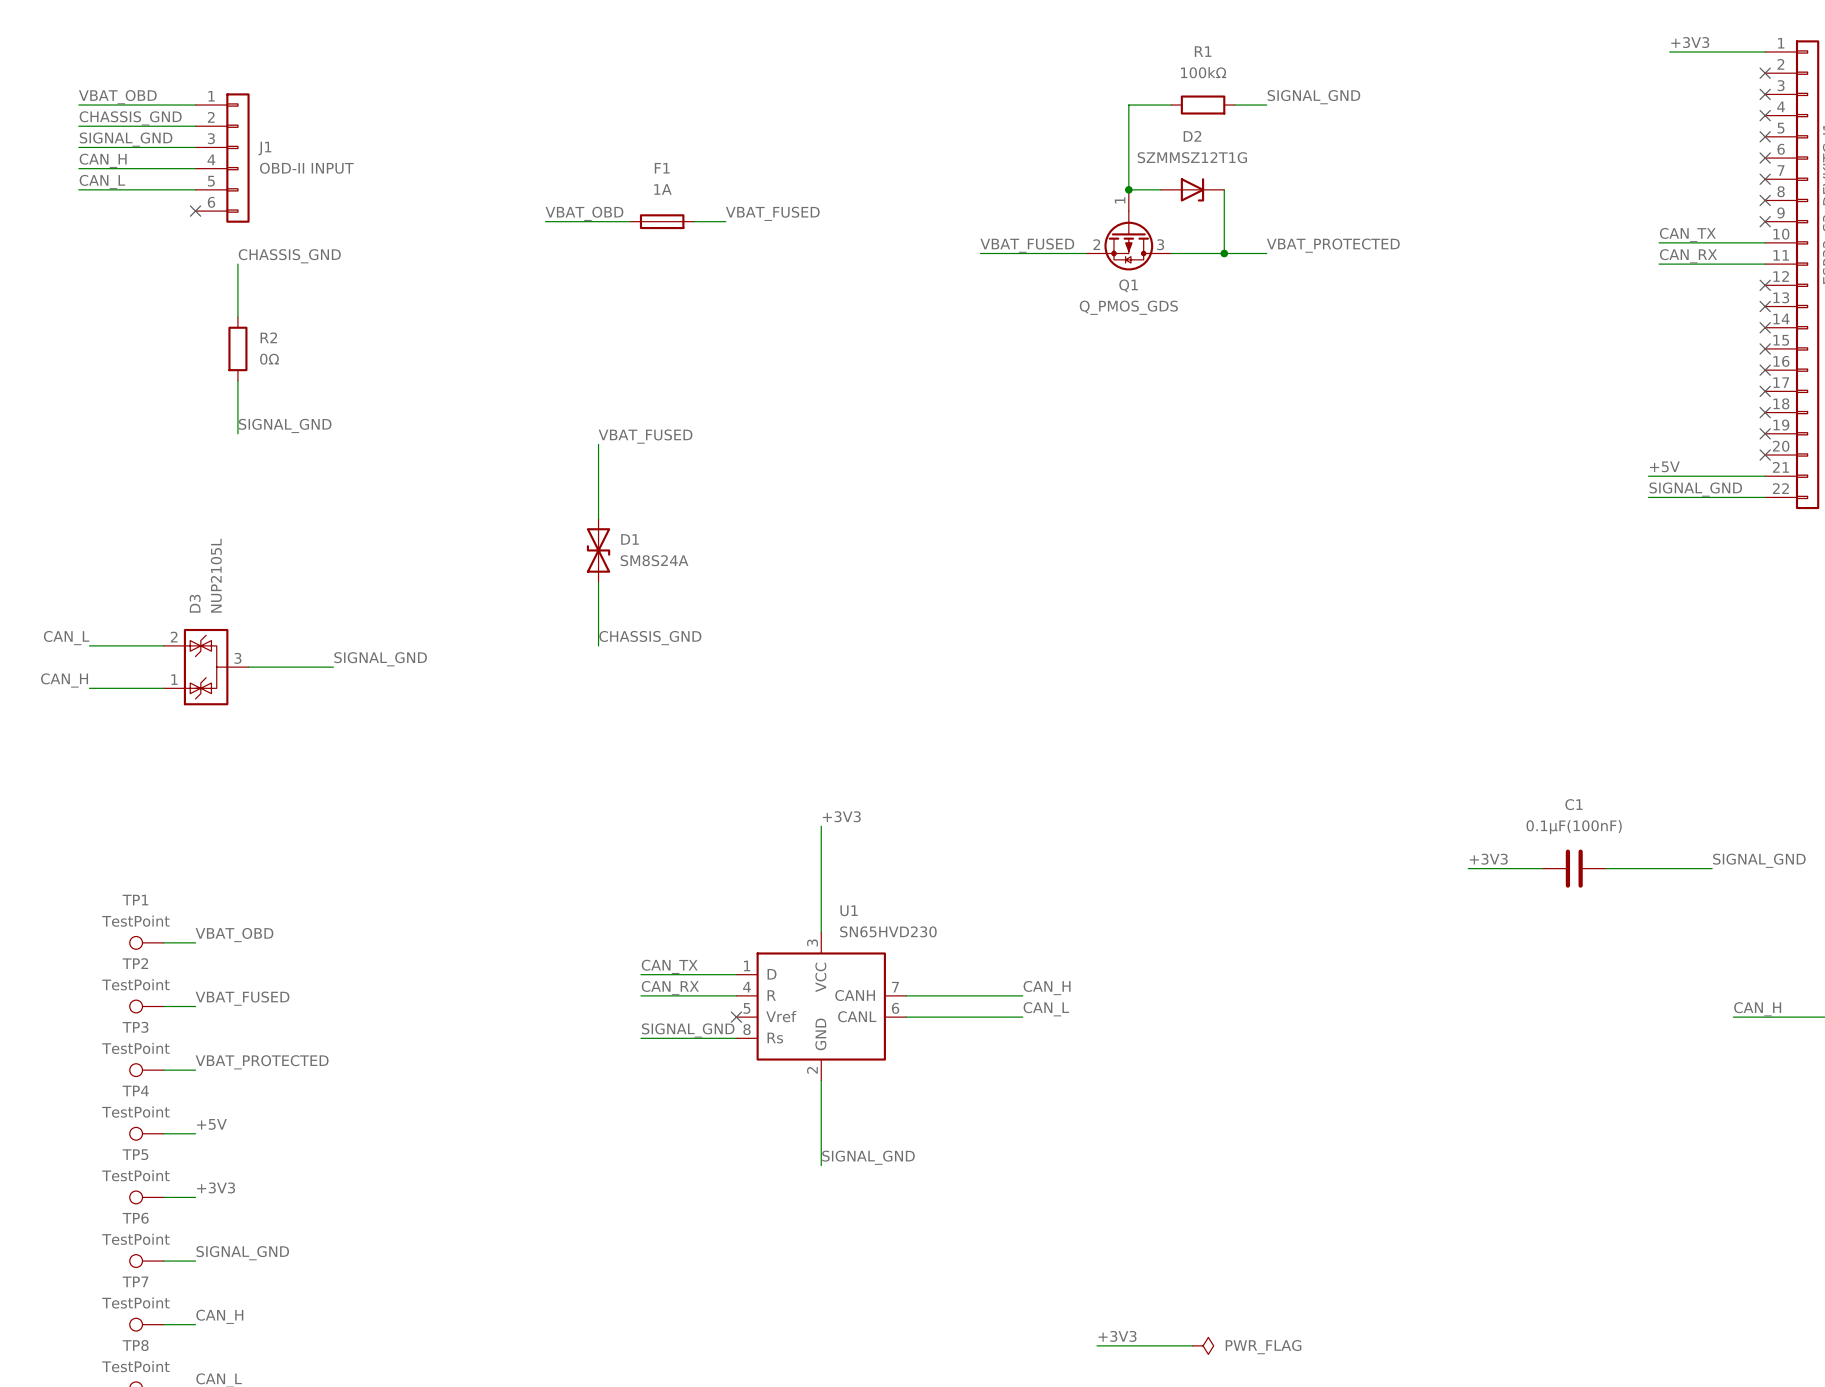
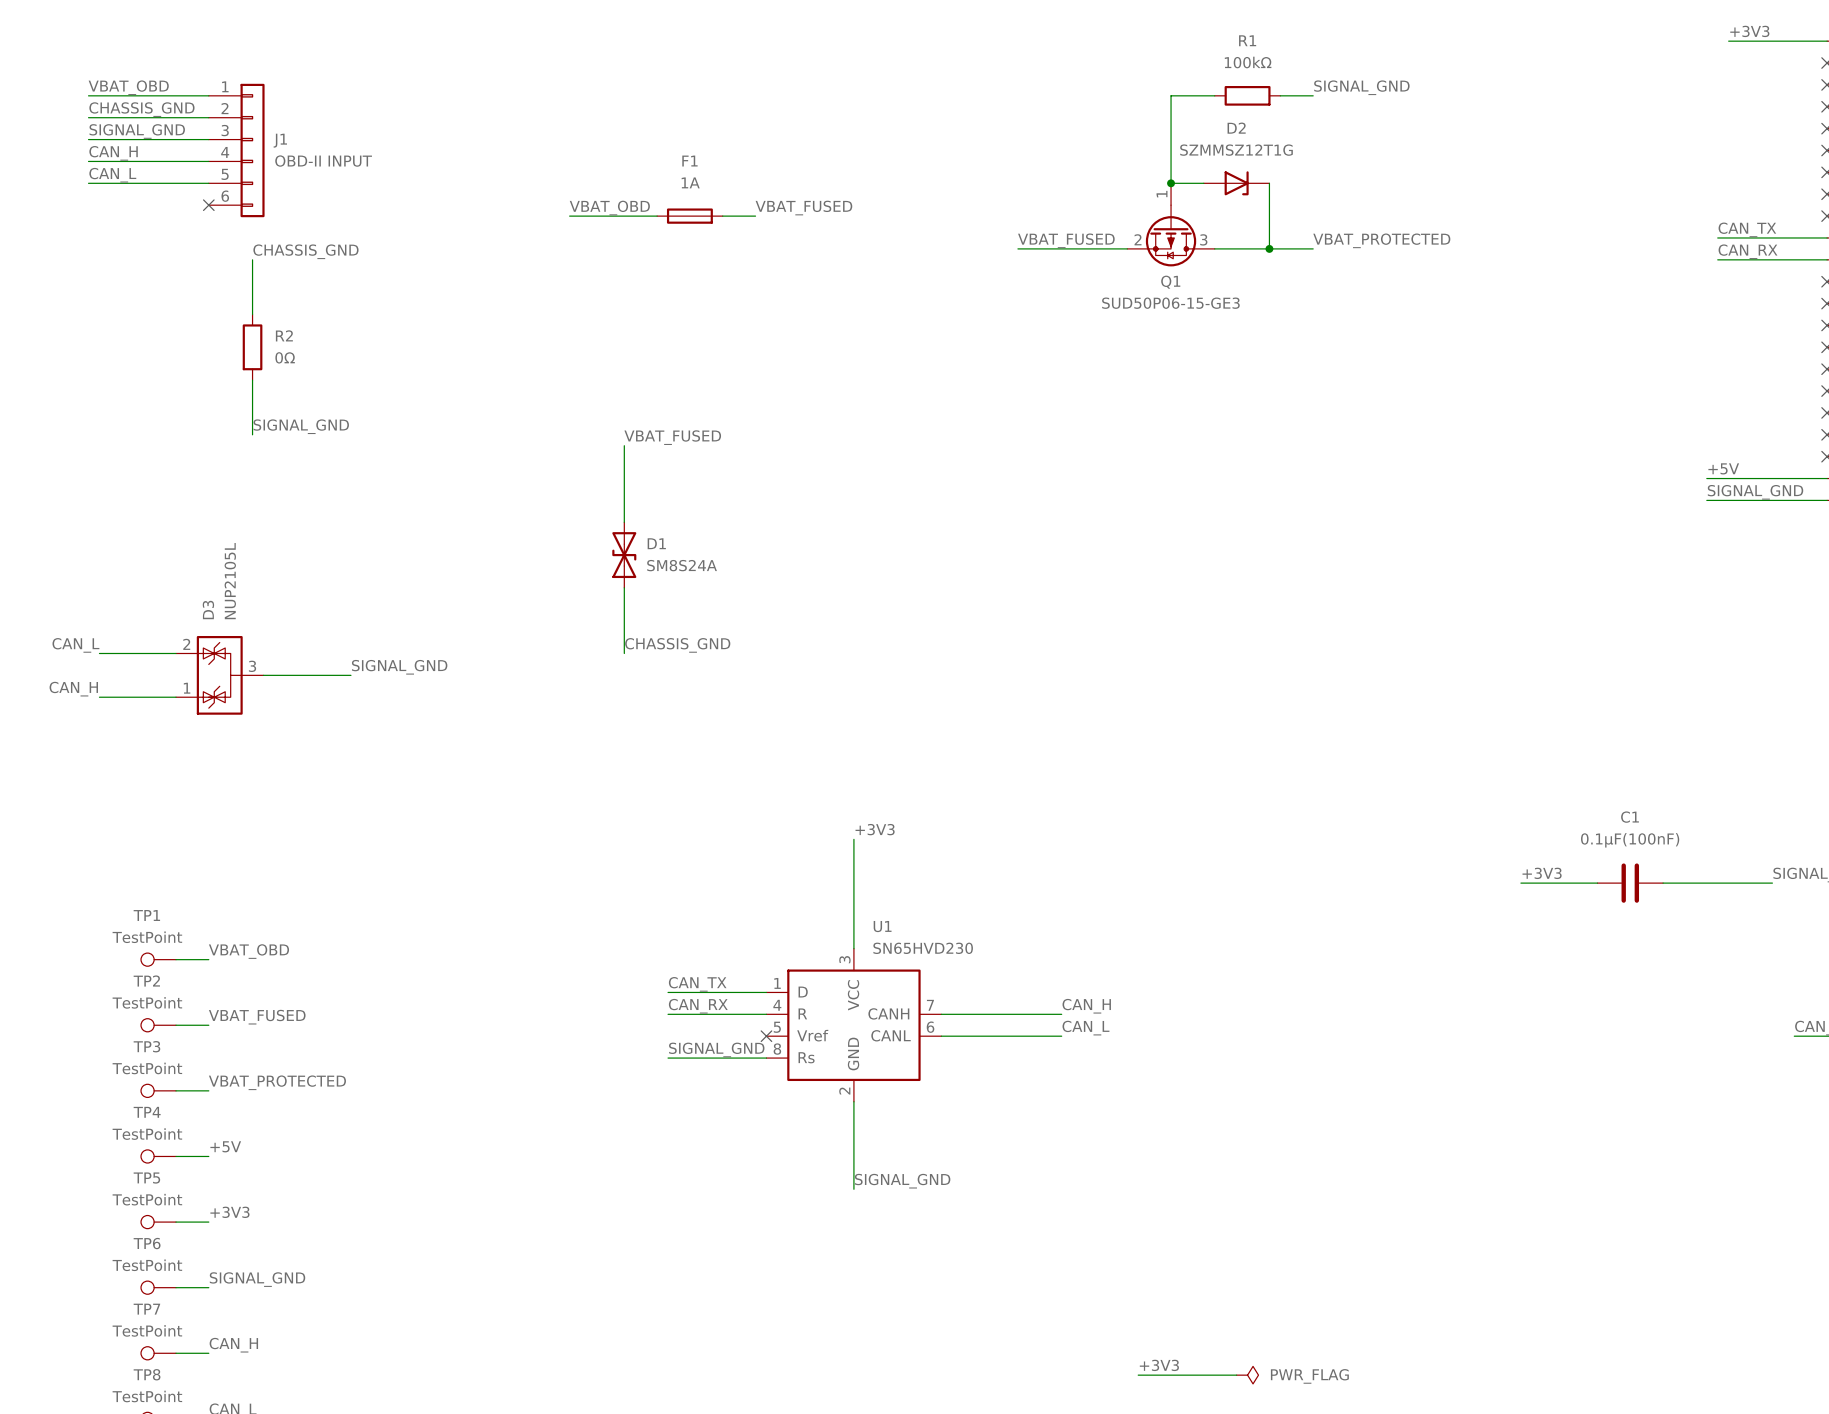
Q1 value: Q_PMOS_GDS (1128, 307) -> SUD50P06-15-GE3 (1170, 303)

